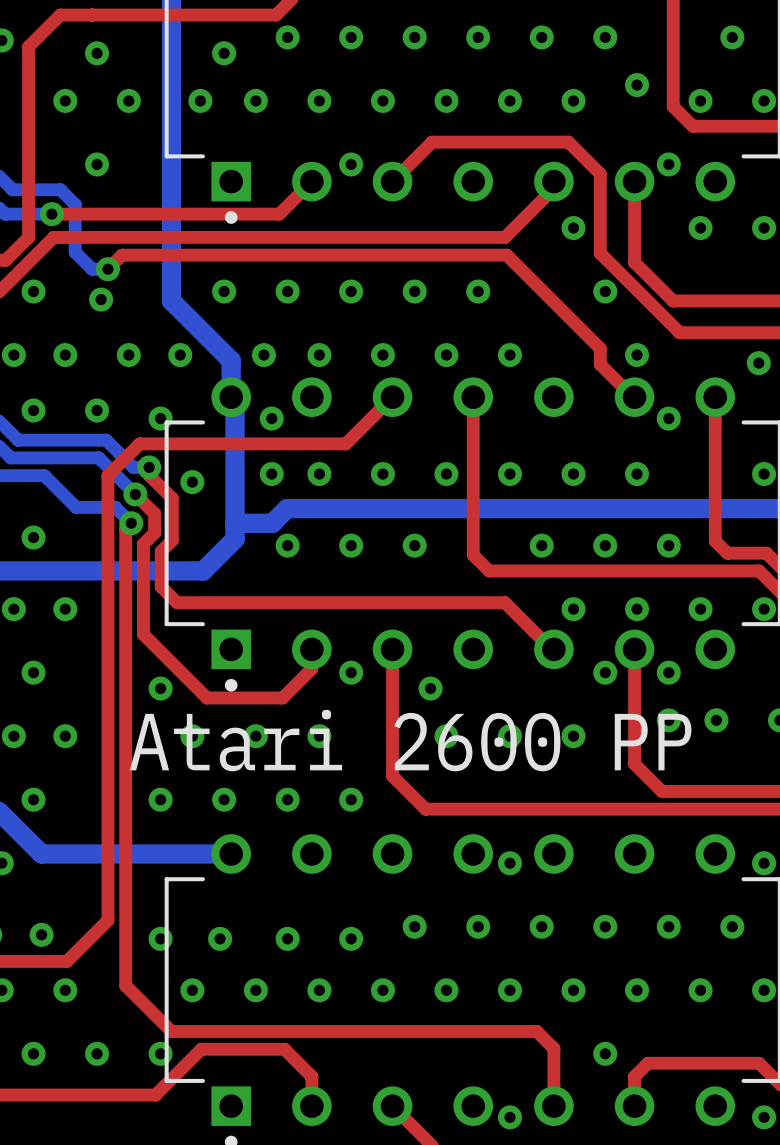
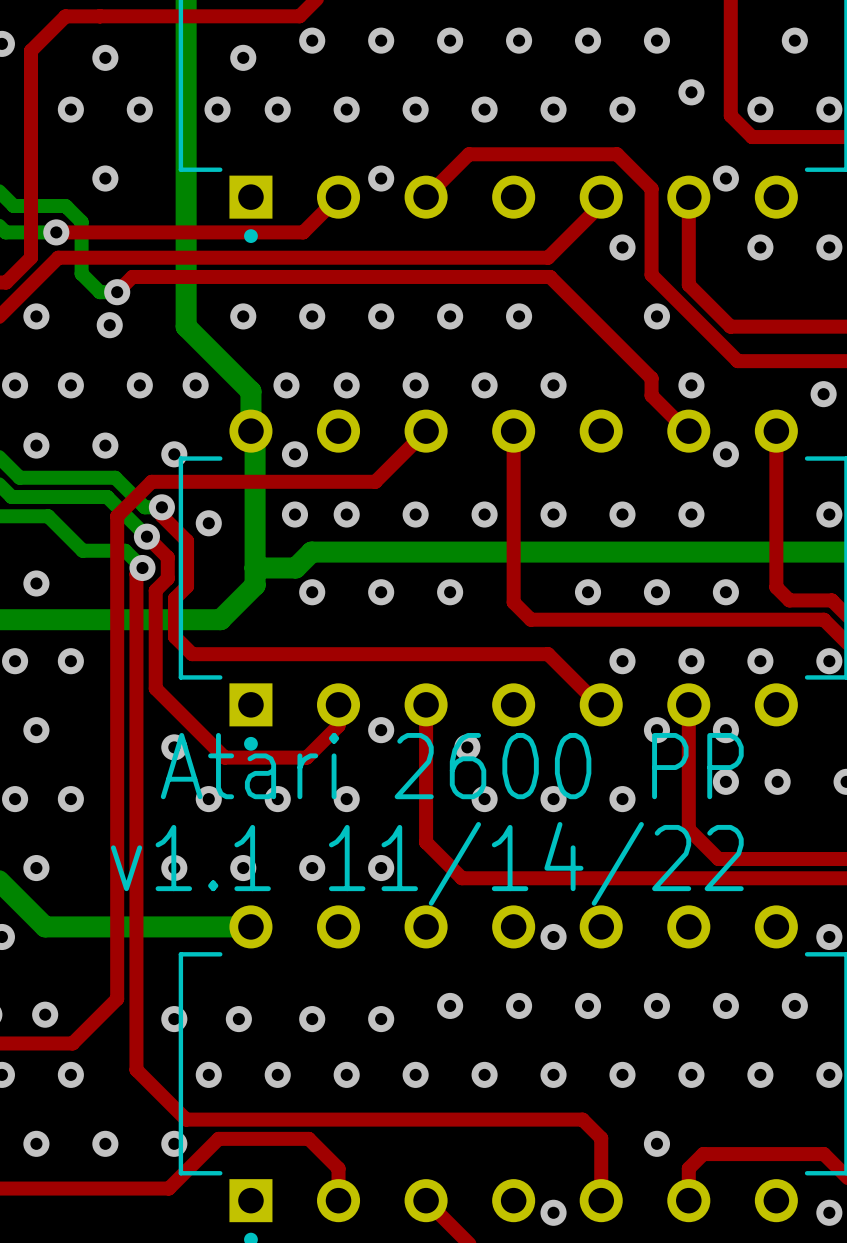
text position: Atari 2600 PP (410, 740) -> Atari 2600 PP (452, 766)
text: none -> v1.1 11/14/22 (427, 863)

